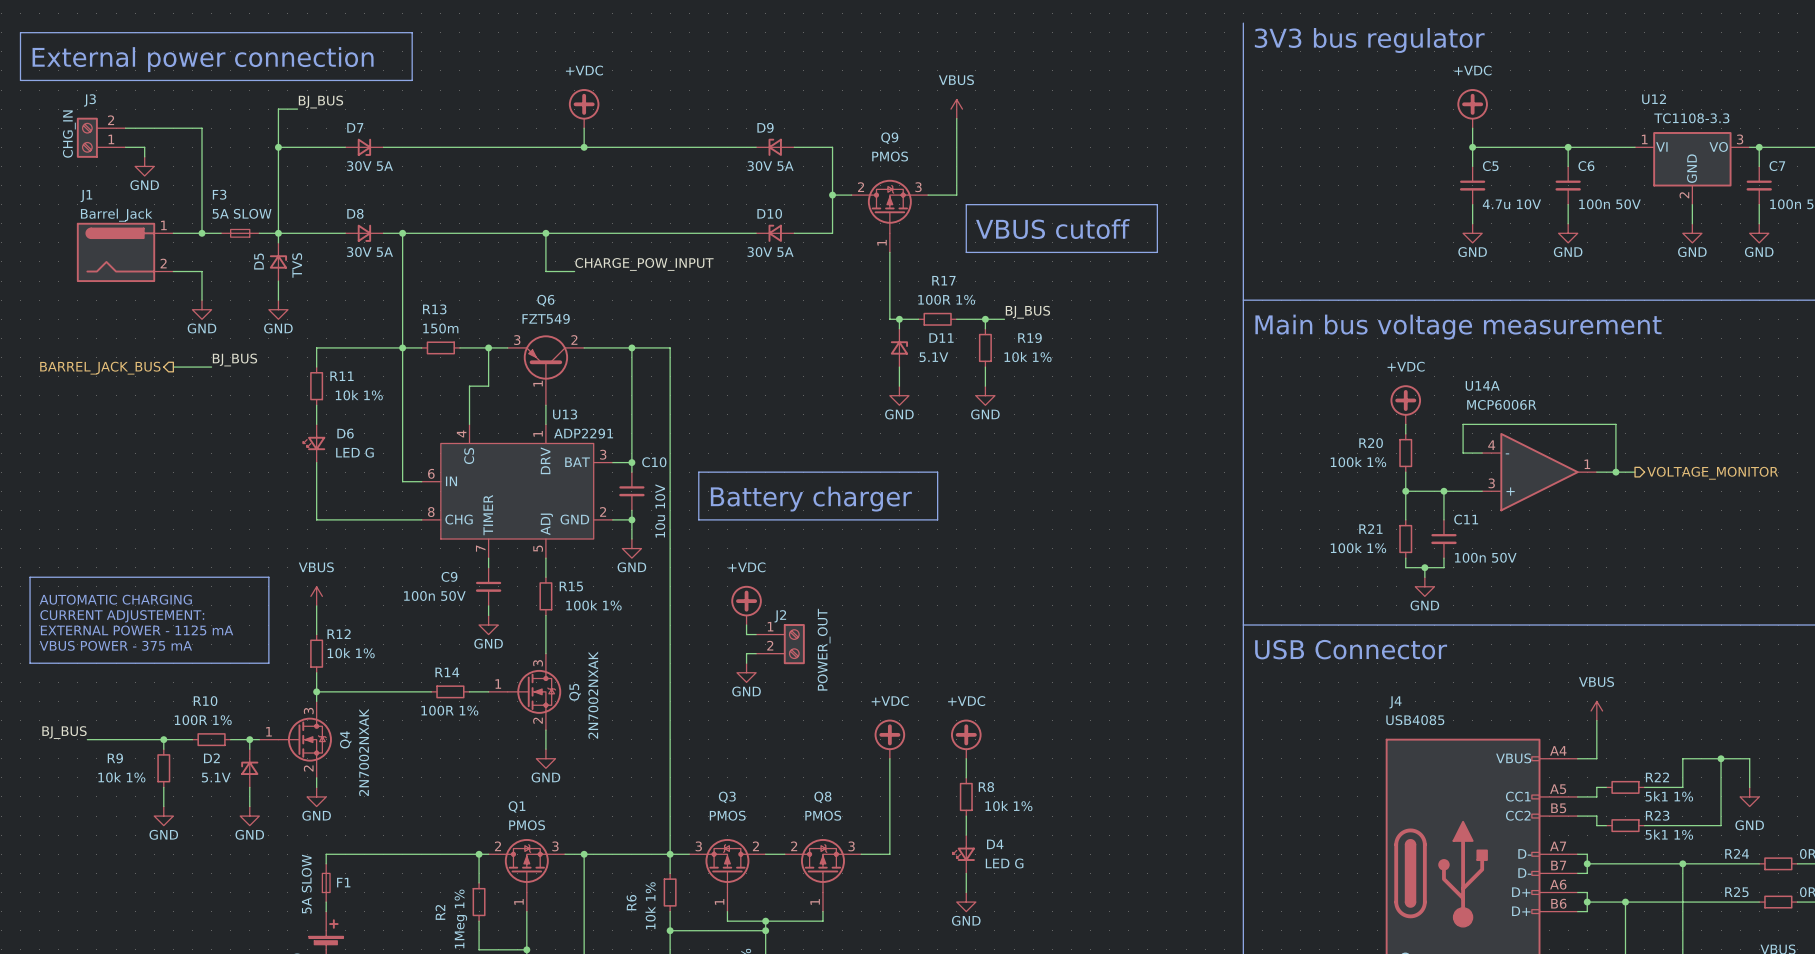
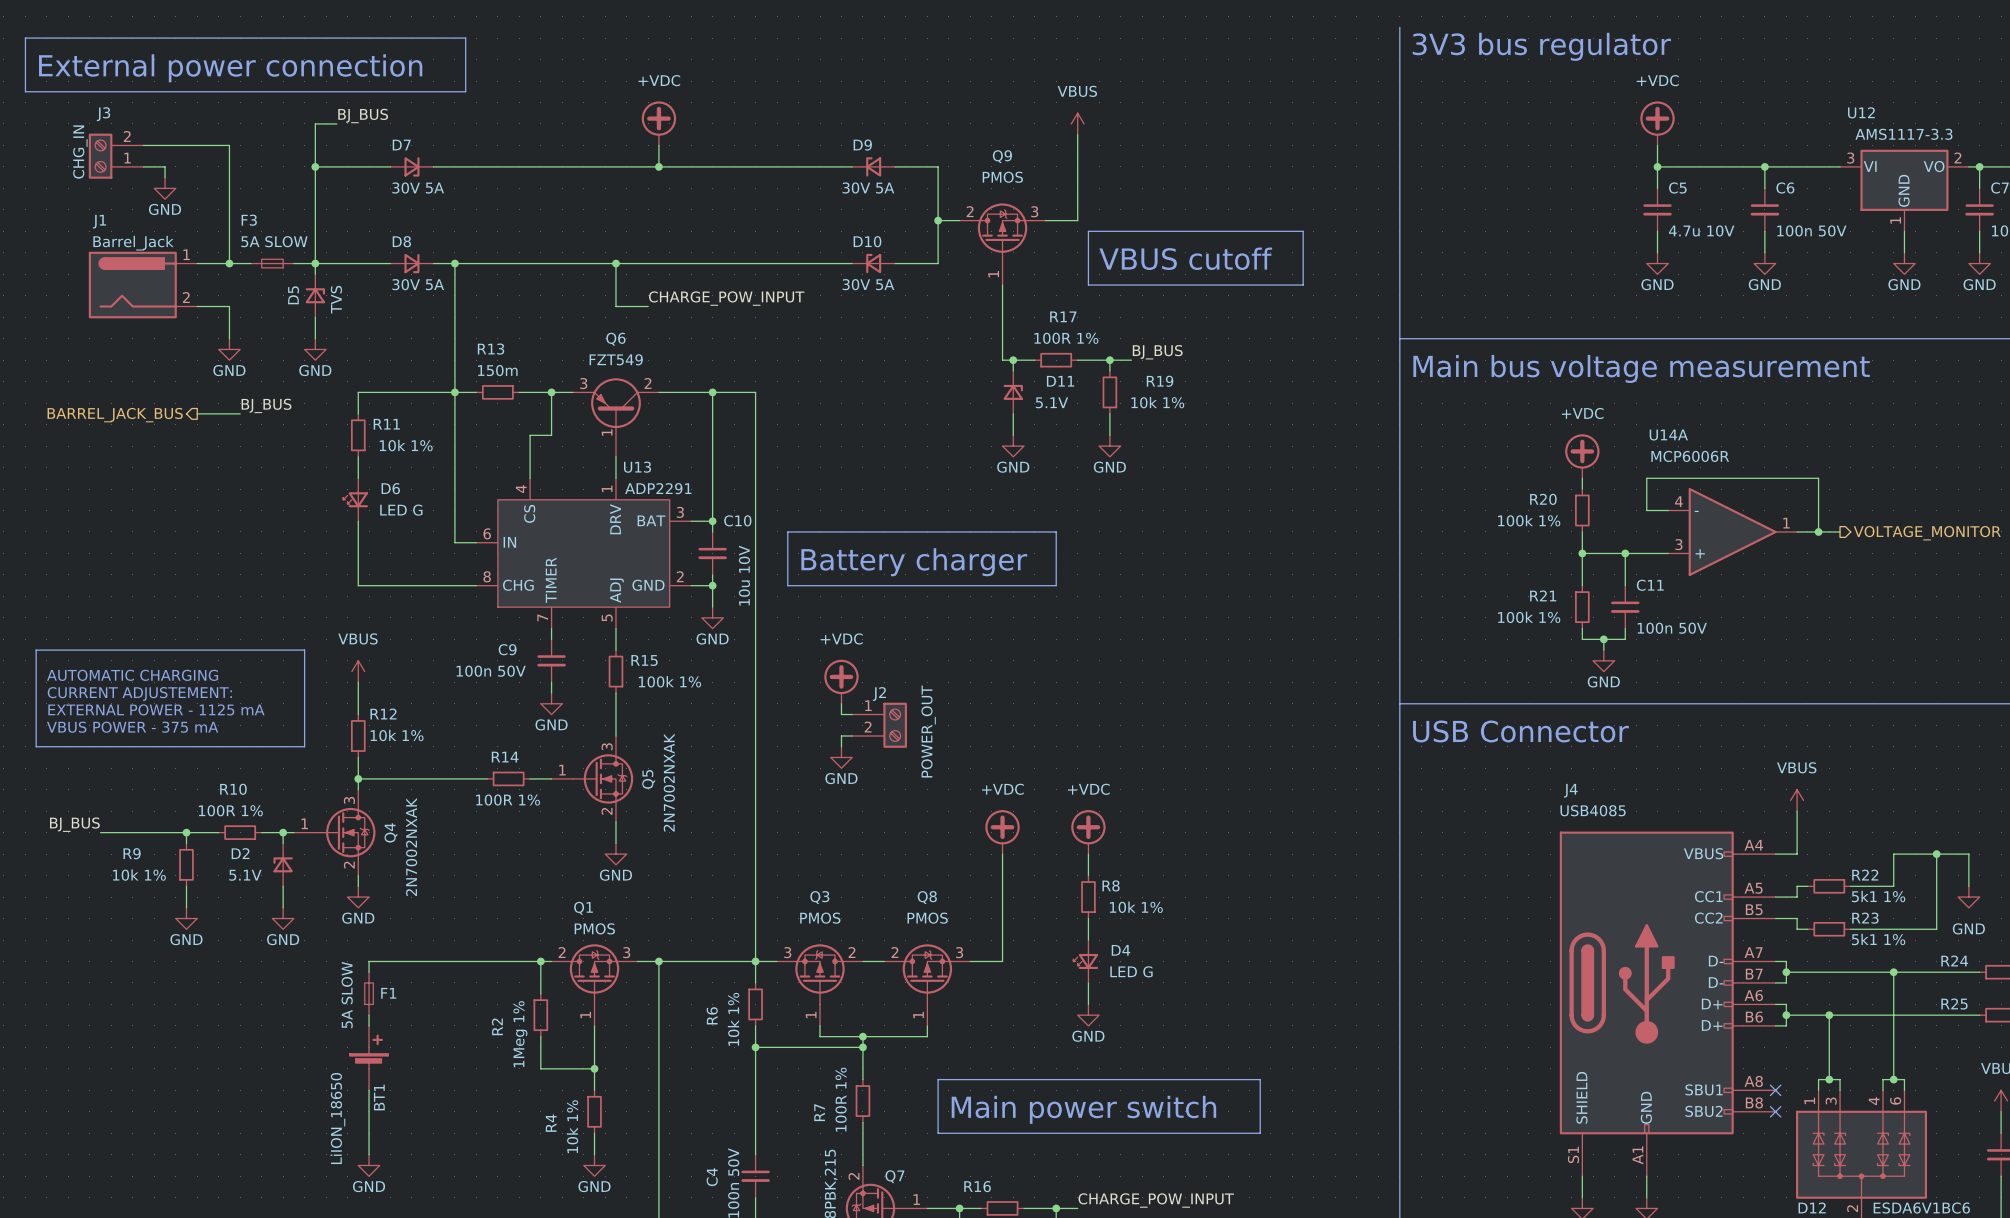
U12 value: TC1108-3.3 (1691, 118) -> AMS1117-3.3 (1903, 134)
U12 pin number: 1 (1644, 139) -> 3 (1850, 158)
U12 pin number: 3 (1740, 139) -> 2 (1957, 157)
U12 pin number: 2 (1684, 195) -> 1 (1895, 220)

